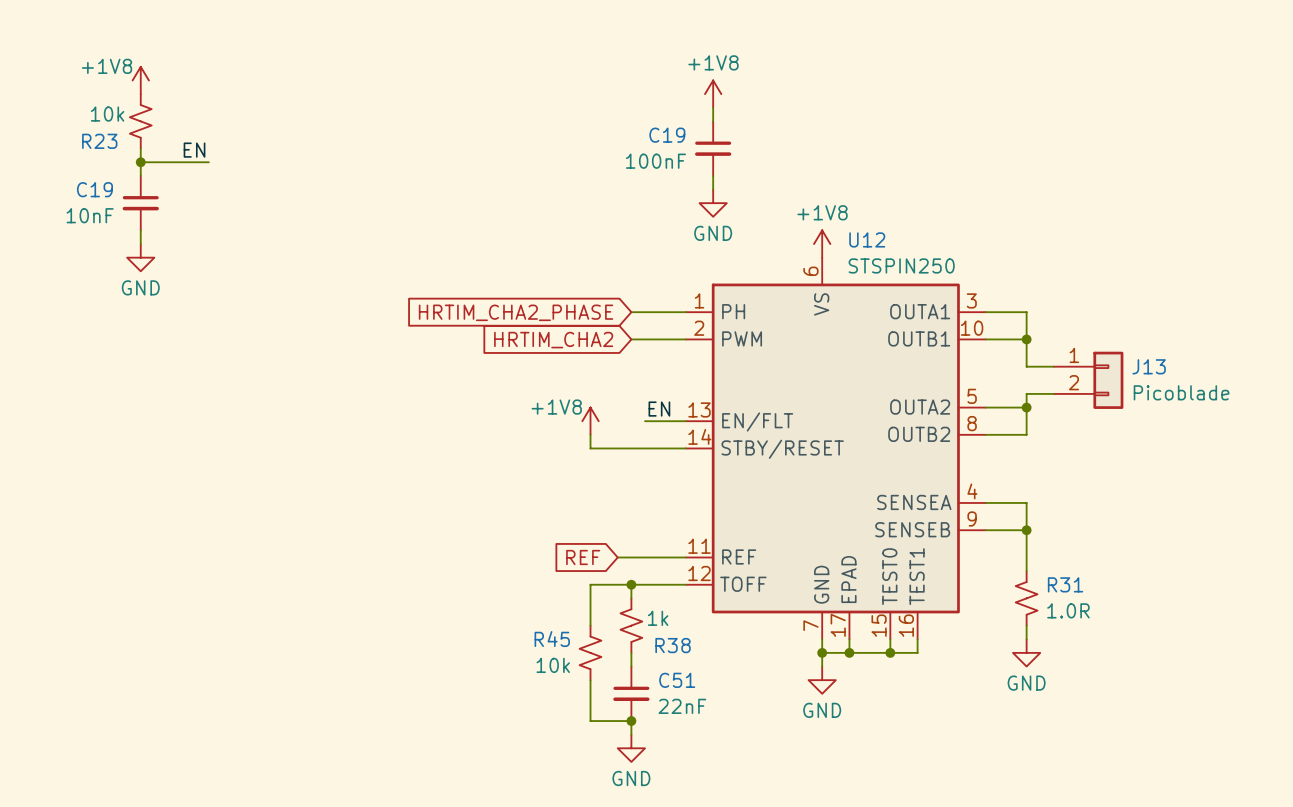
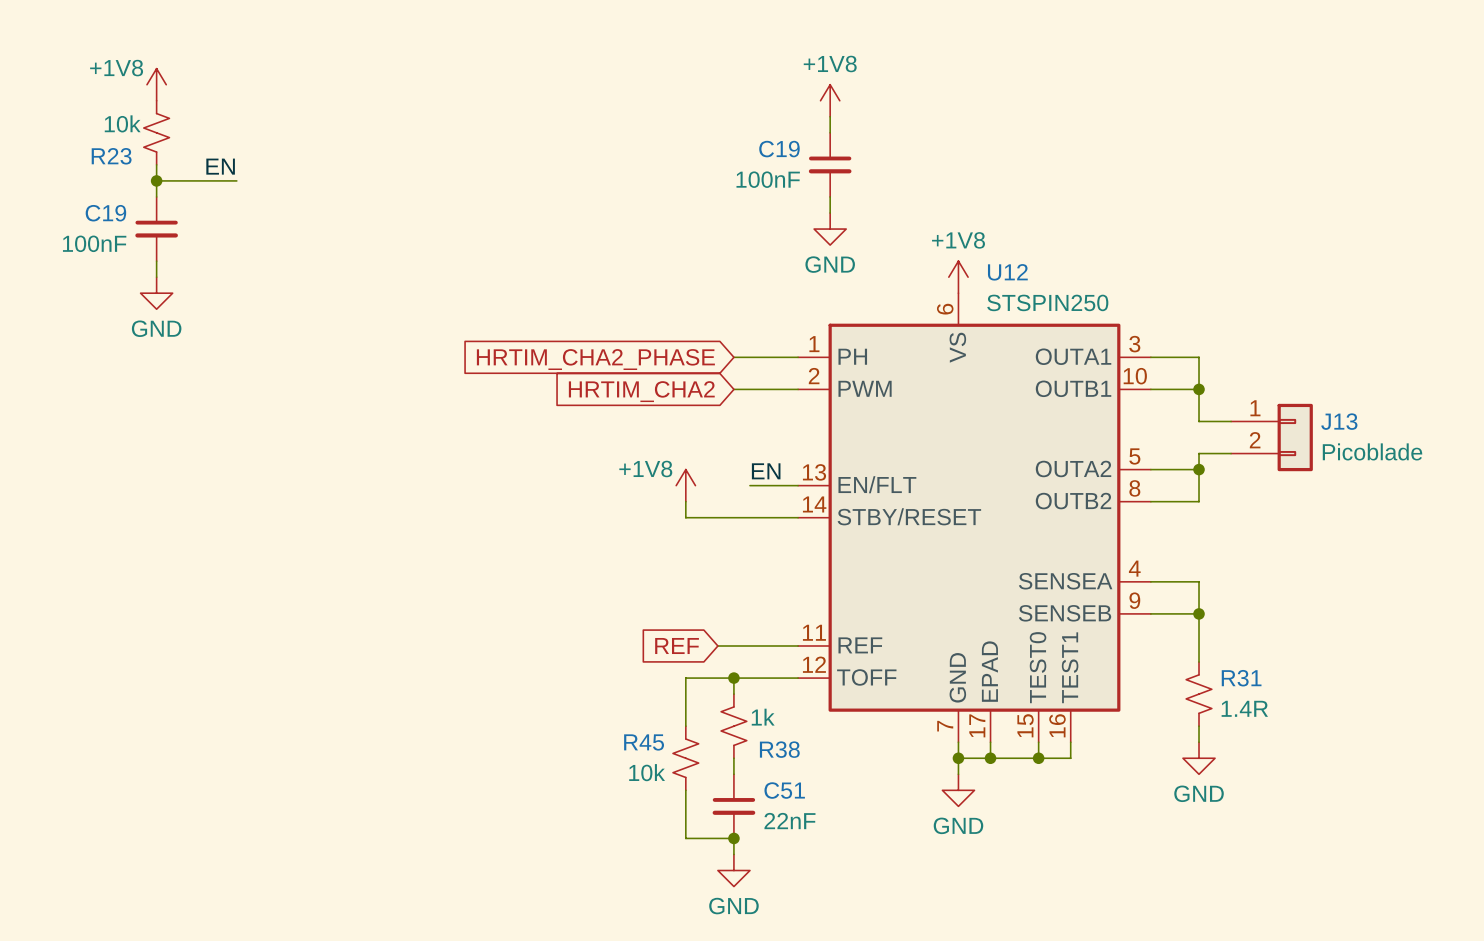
C19 value: 10nF (90, 215) -> 100nF (94, 243)
R31 value: 1.0R (1068, 610) -> 1.4R (1244, 708)

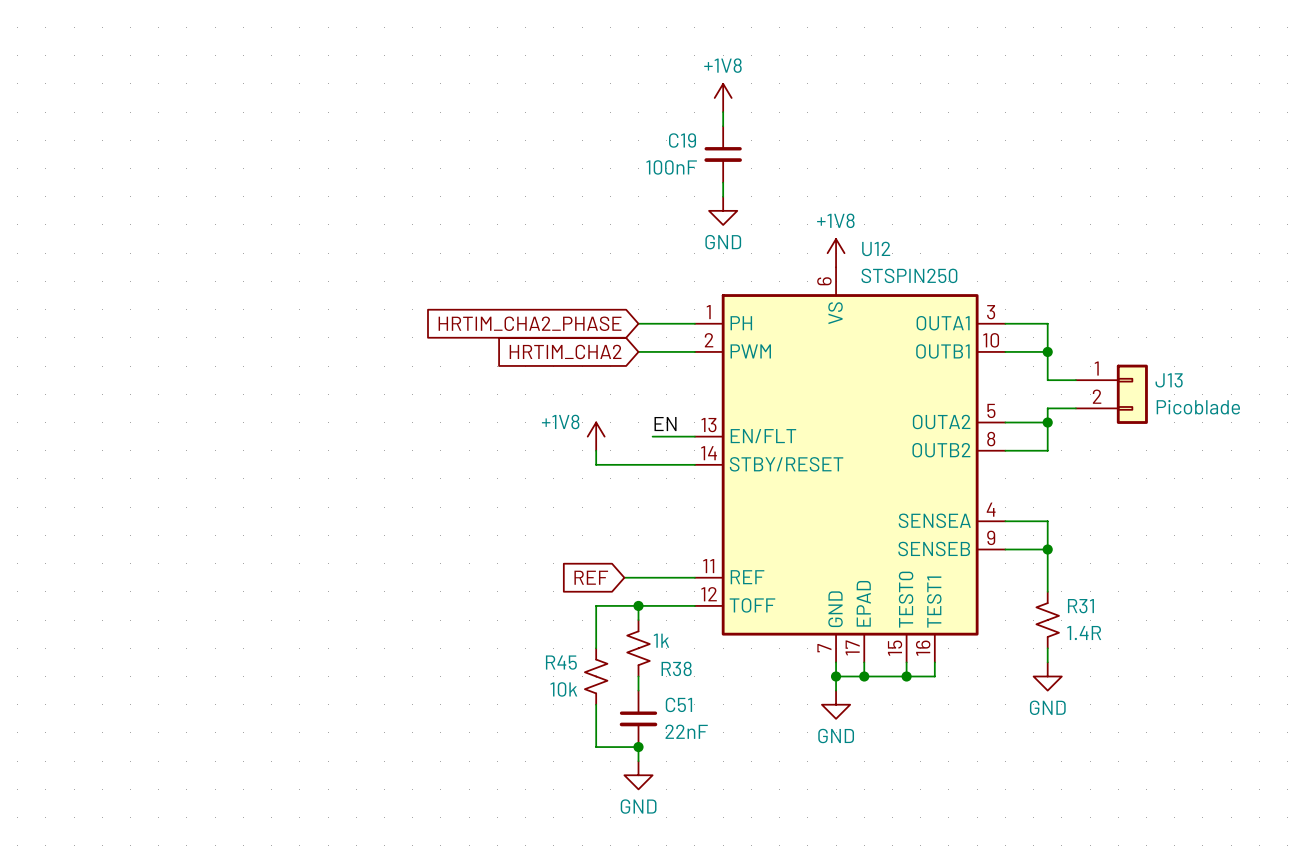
power symbol: +1V8 (156, 84) -> none
R23: 10k (156, 132) -> none
wire: (156, 164) (156, 196) -> none
label: EN (220, 166) -> none
wire: (156, 180) (236, 180) -> none
junction: (156, 180) -> none
C19: 100nF (156, 229) -> none
wire: (156, 261) (156, 277) -> none
power symbol: GND (156, 293) -> none

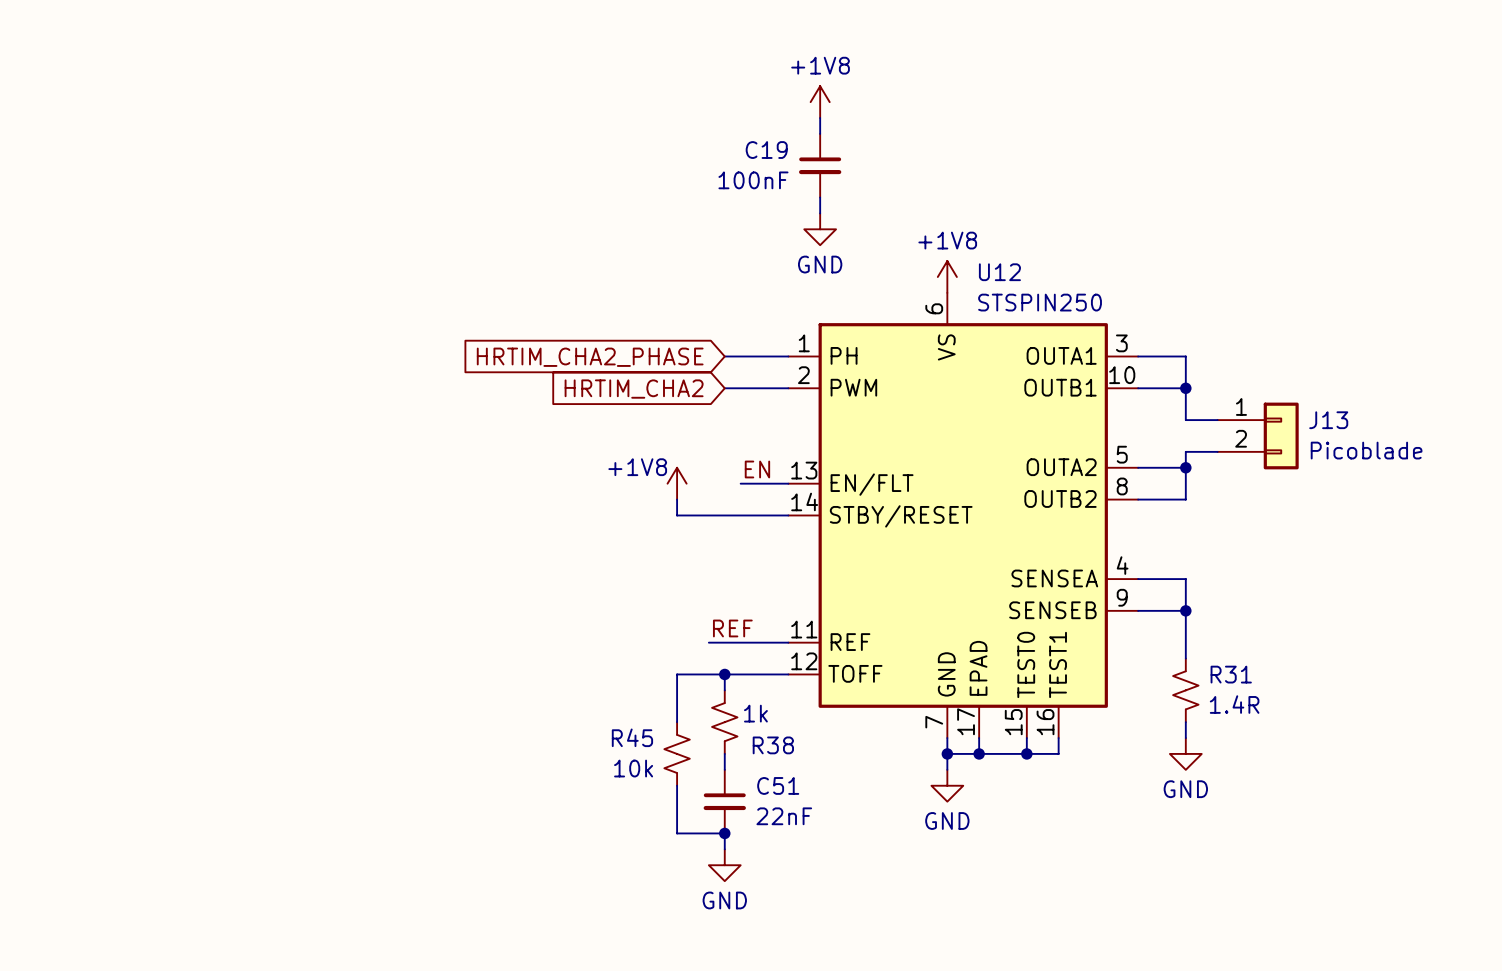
label: none -> REF (732, 628)
global label: REF (591, 577) -> none

